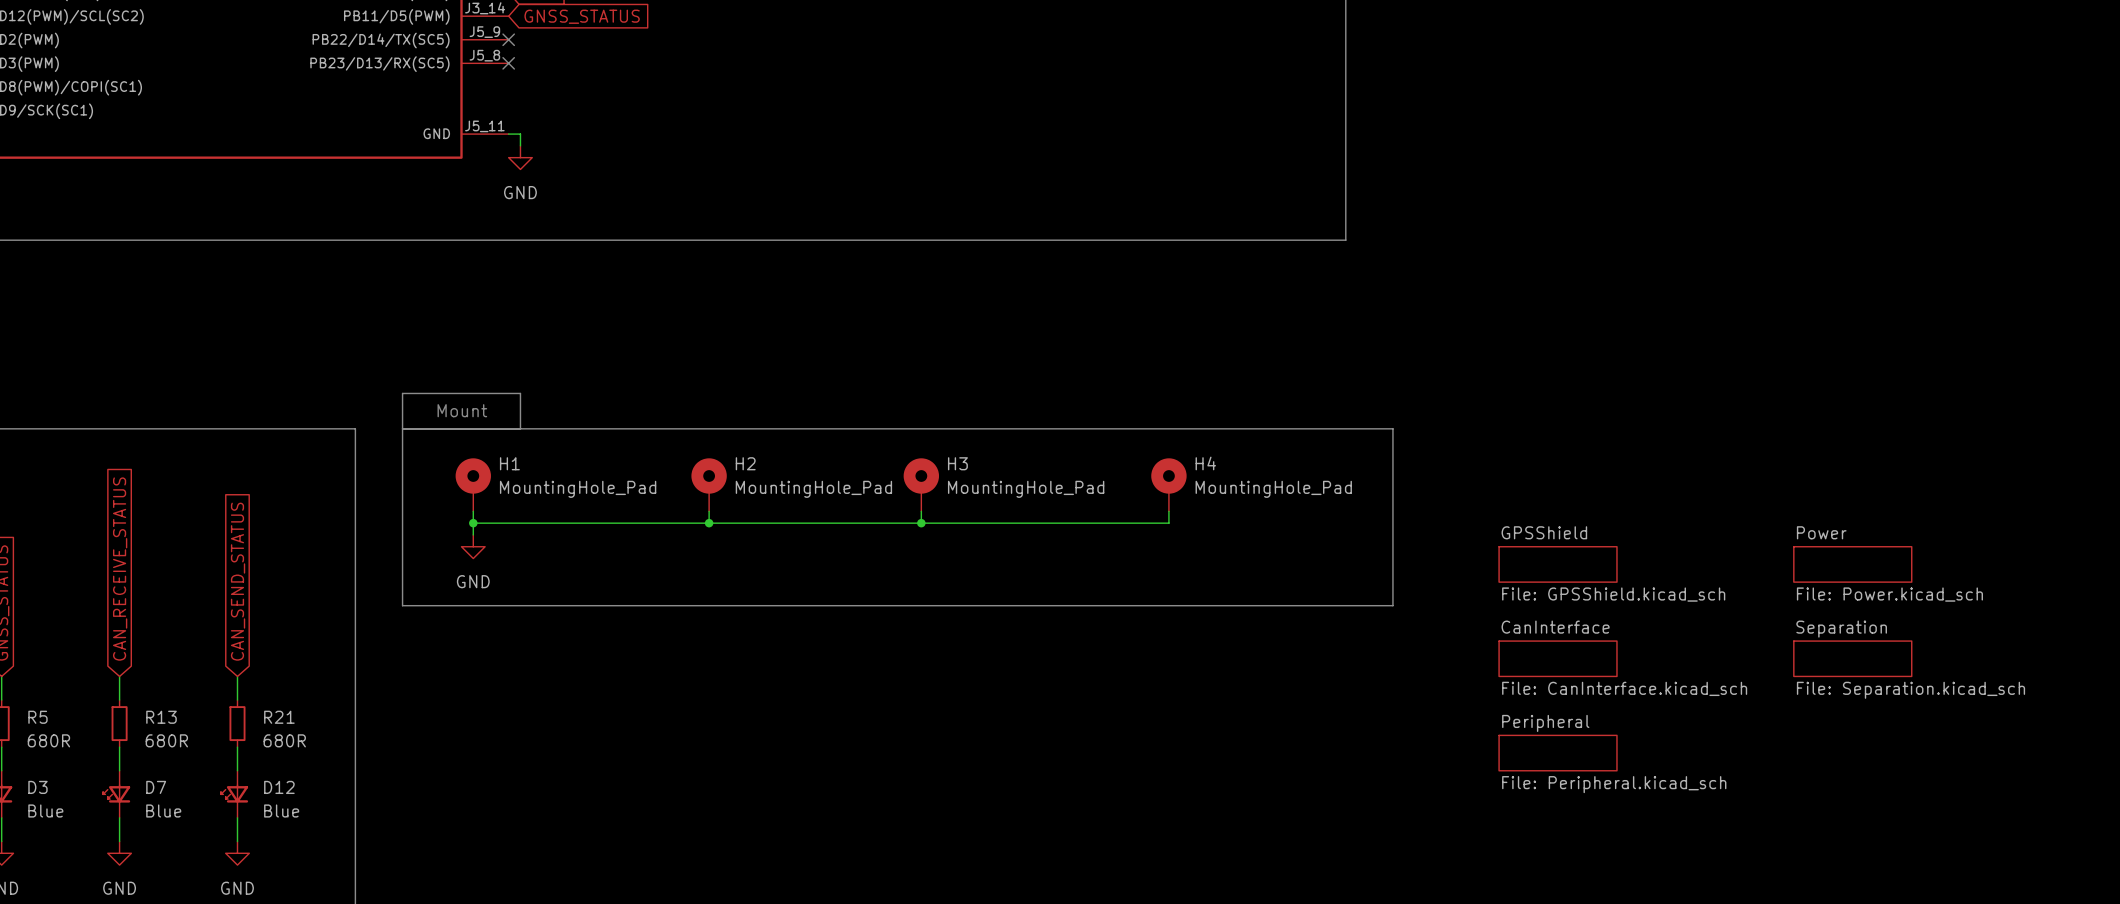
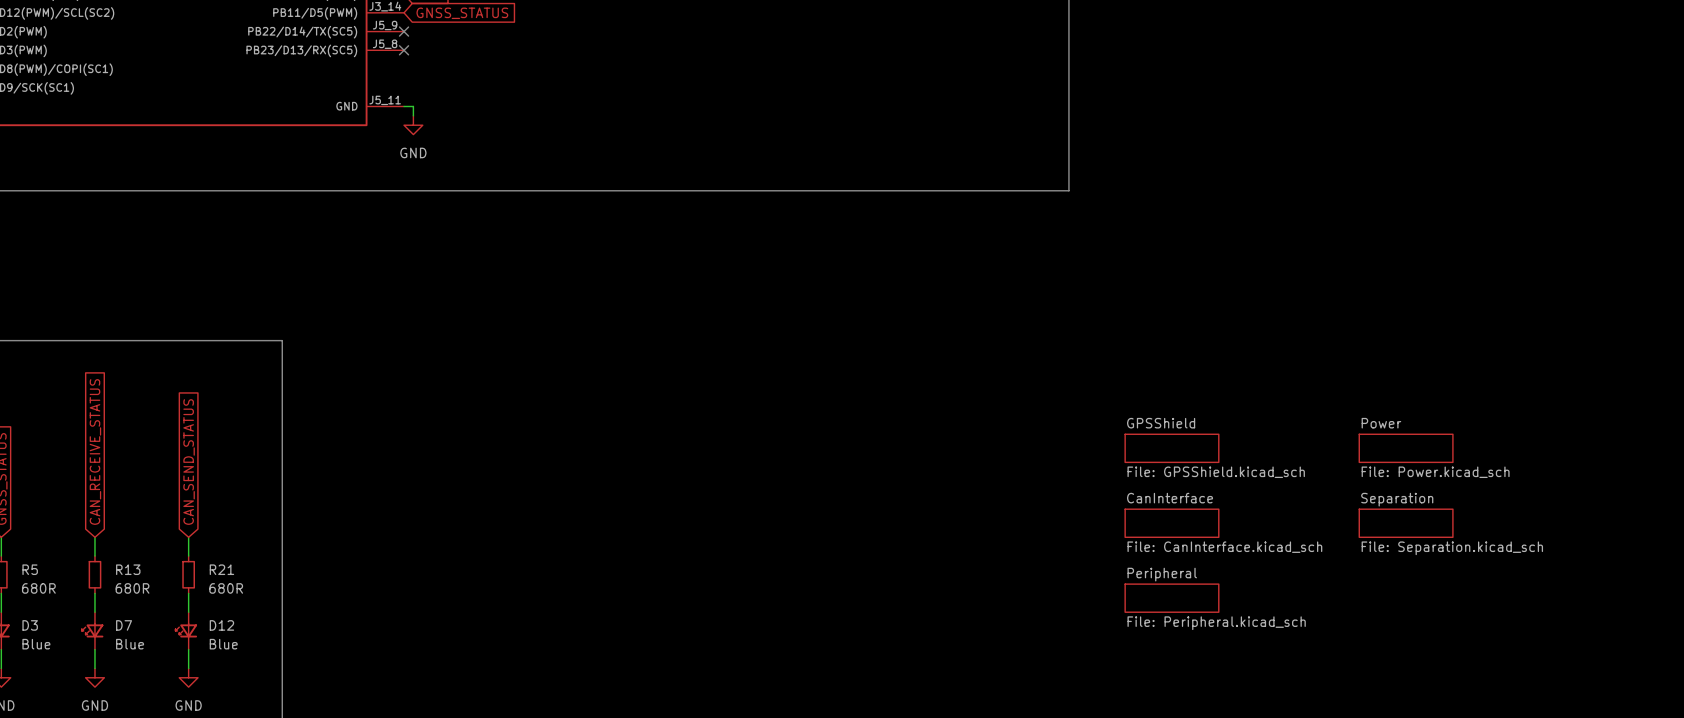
text: Mount (462, 410) -> none
line: (402, 428) (1392, 428) (1392, 605) (402, 605) (402, 393) (520, 393) (520, 428) -> none
H1: MountingHole_Pad (473, 484) -> none
H2: MountingHole_Pad (709, 484) -> none
H3: MountingHole_Pad (921, 484) -> none
H4: MountingHole_Pad (1168, 484) -> none
wire: (473, 511) (473, 534) -> none
wire: (709, 511) (709, 523) -> none
wire: (921, 511) (921, 523) -> none
wire: (1168, 511) (1168, 523) (473, 523) -> none
junction: (473, 523) -> none
junction: (709, 523) -> none
junction: (921, 523) -> none
power symbol: GND (473, 546) -> none
sheet GPSShield position: (1558, 564) -> (1171, 448)
sheet Power position: (1852, 564) -> (1406, 448)
sheet CanInterface position: (1558, 658) -> (1171, 523)
sheet Separation position: (1852, 658) -> (1406, 523)
sheet Peripheral position: (1558, 753) -> (1171, 598)

